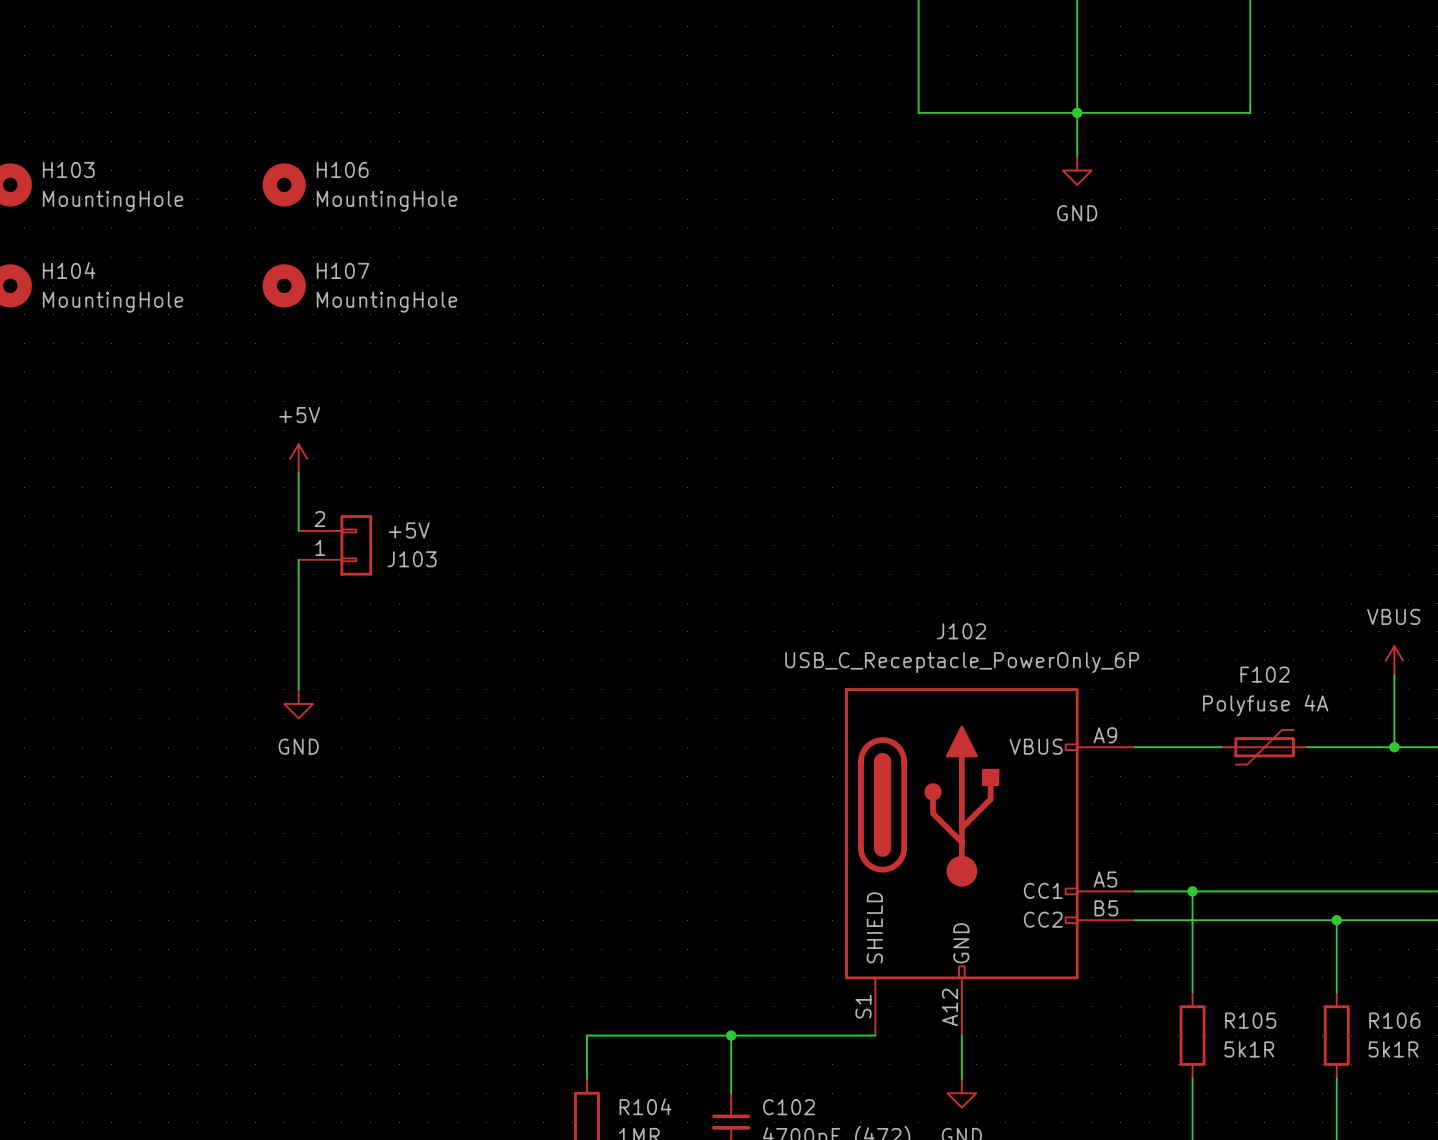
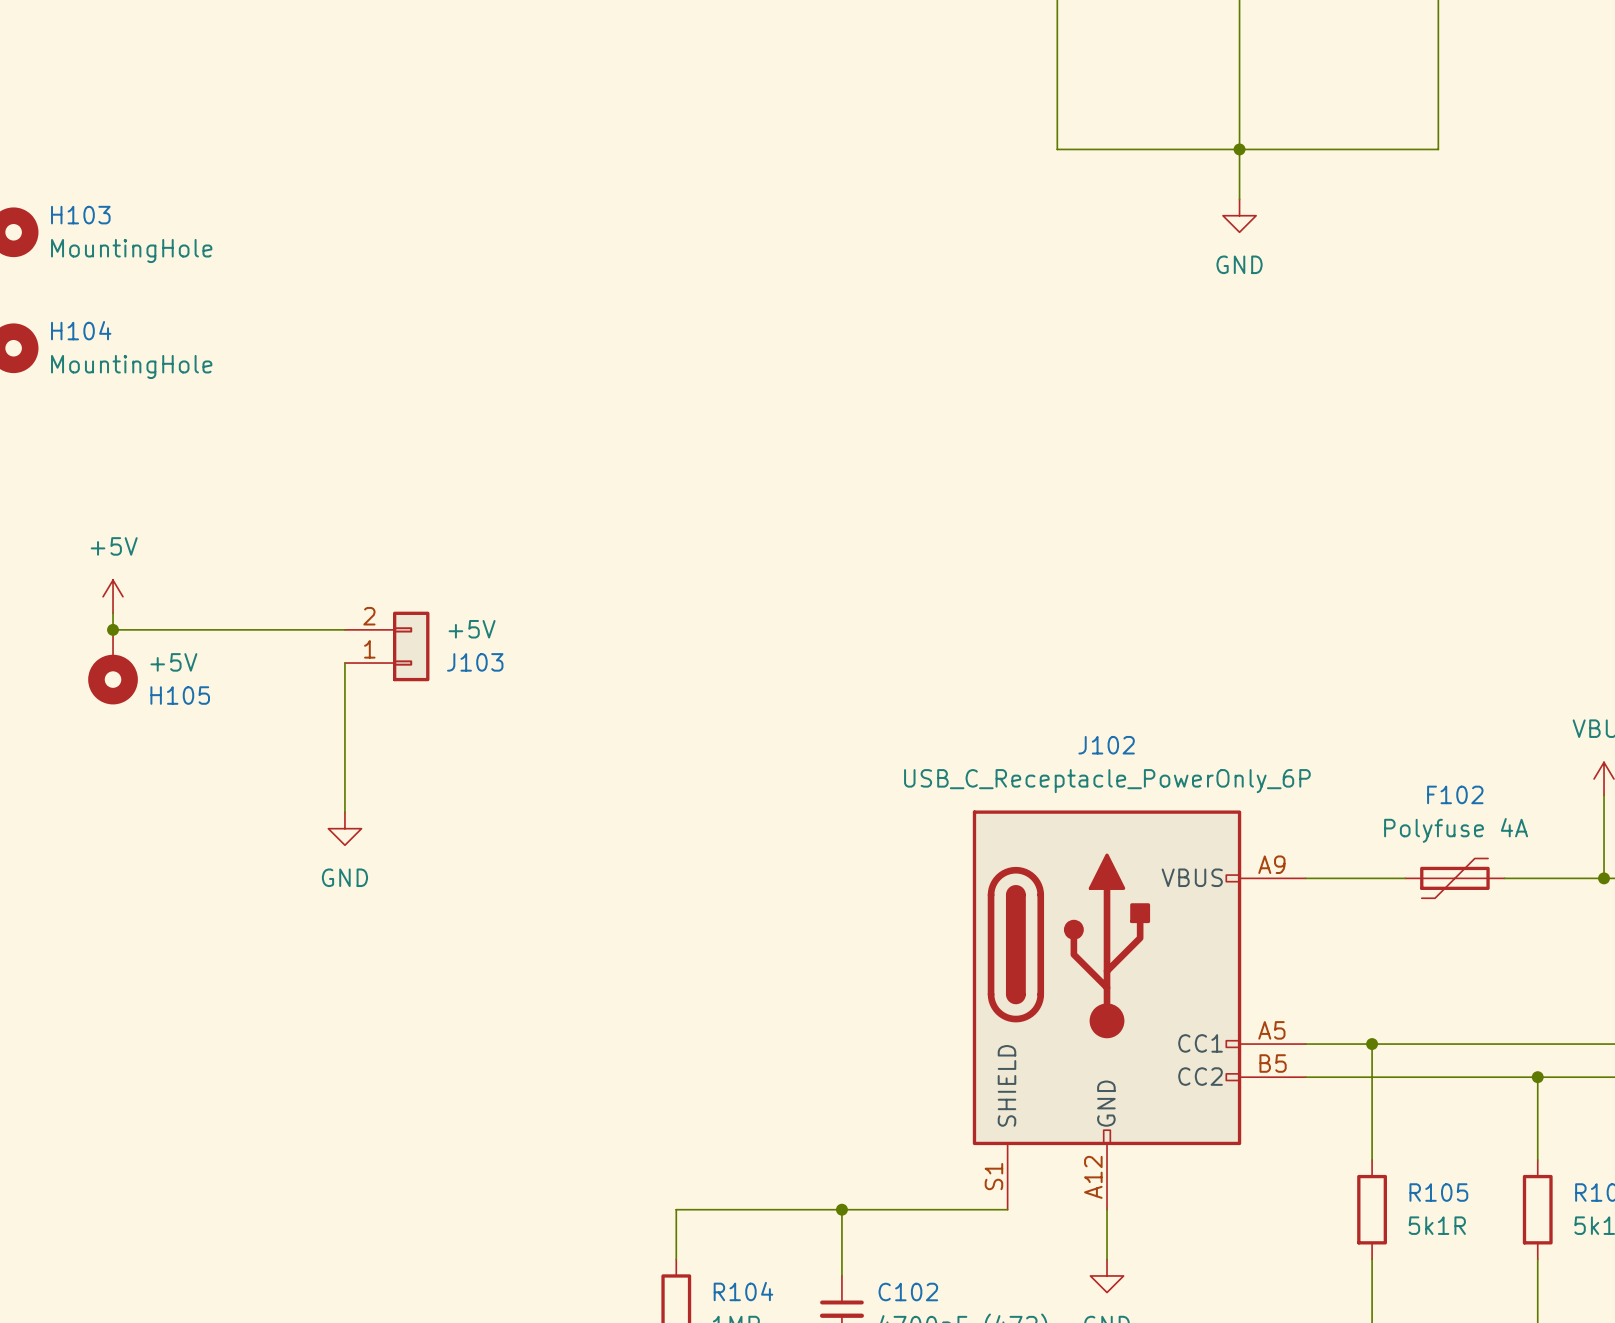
H106: MountingHole (284, 184) -> none
H107: MountingHole (284, 285) -> none
power symbol position: +5V (298, 458) -> +5V (113, 596)
wire: (298, 473) (298, 530) -> (113, 613) (113, 629) (344, 629)
junction: none -> (113, 629)
H105: none -> +5V (113, 667)

